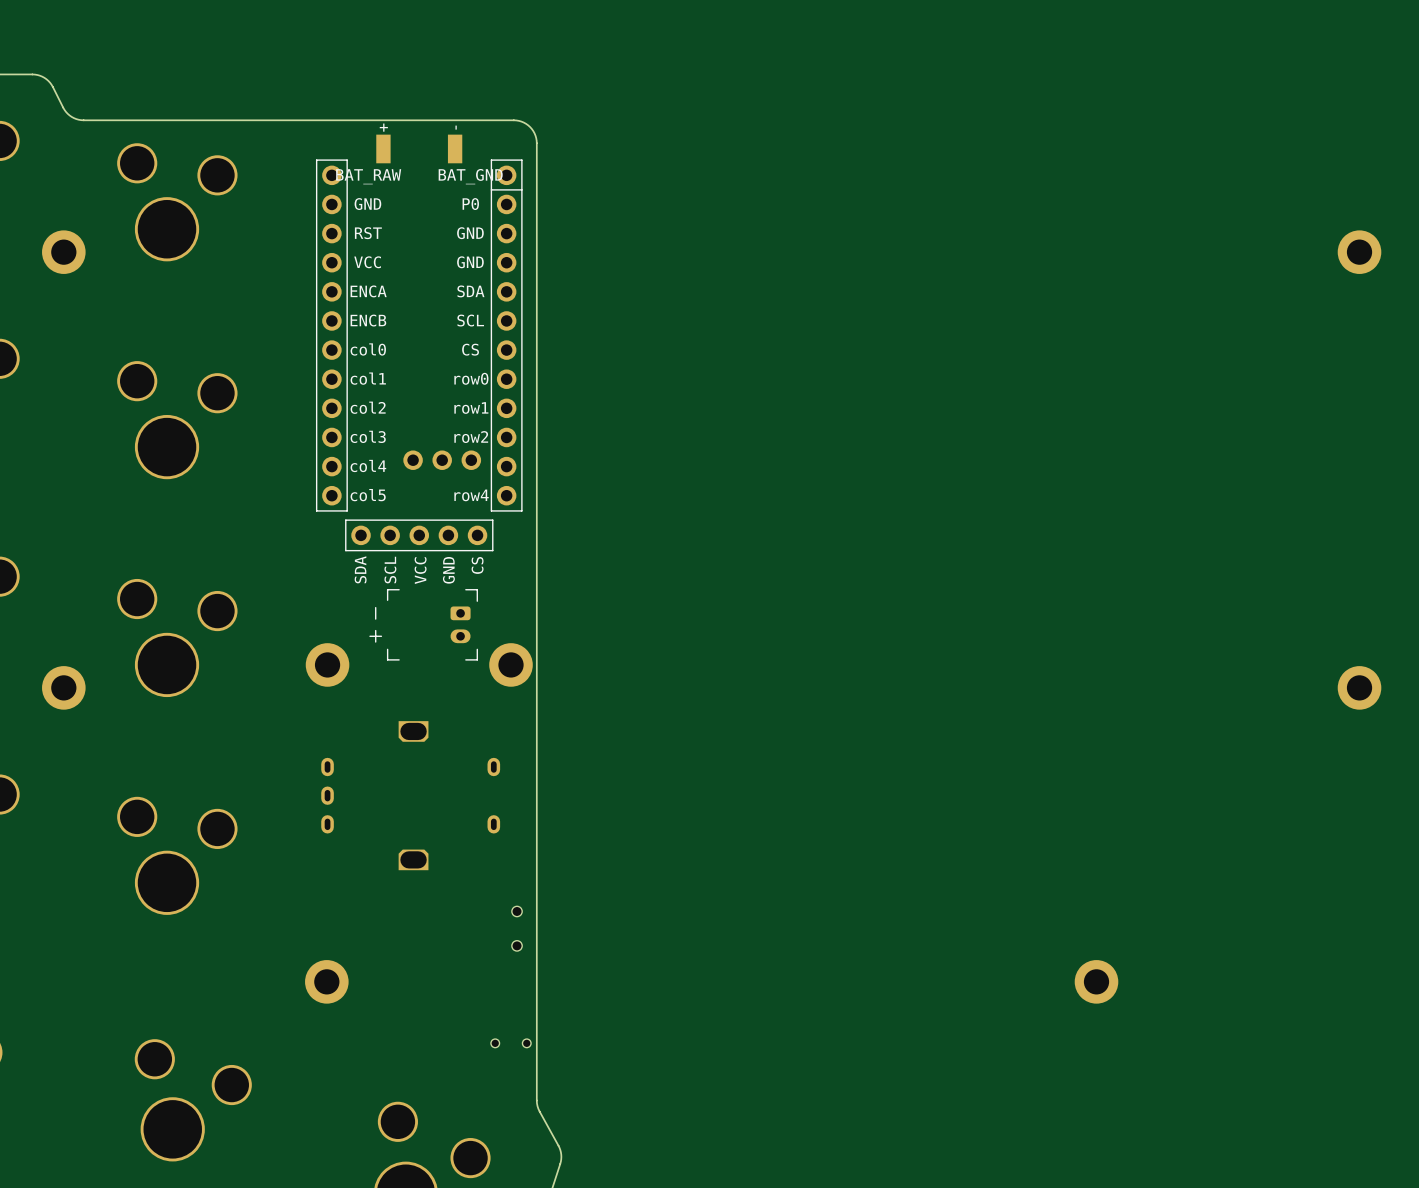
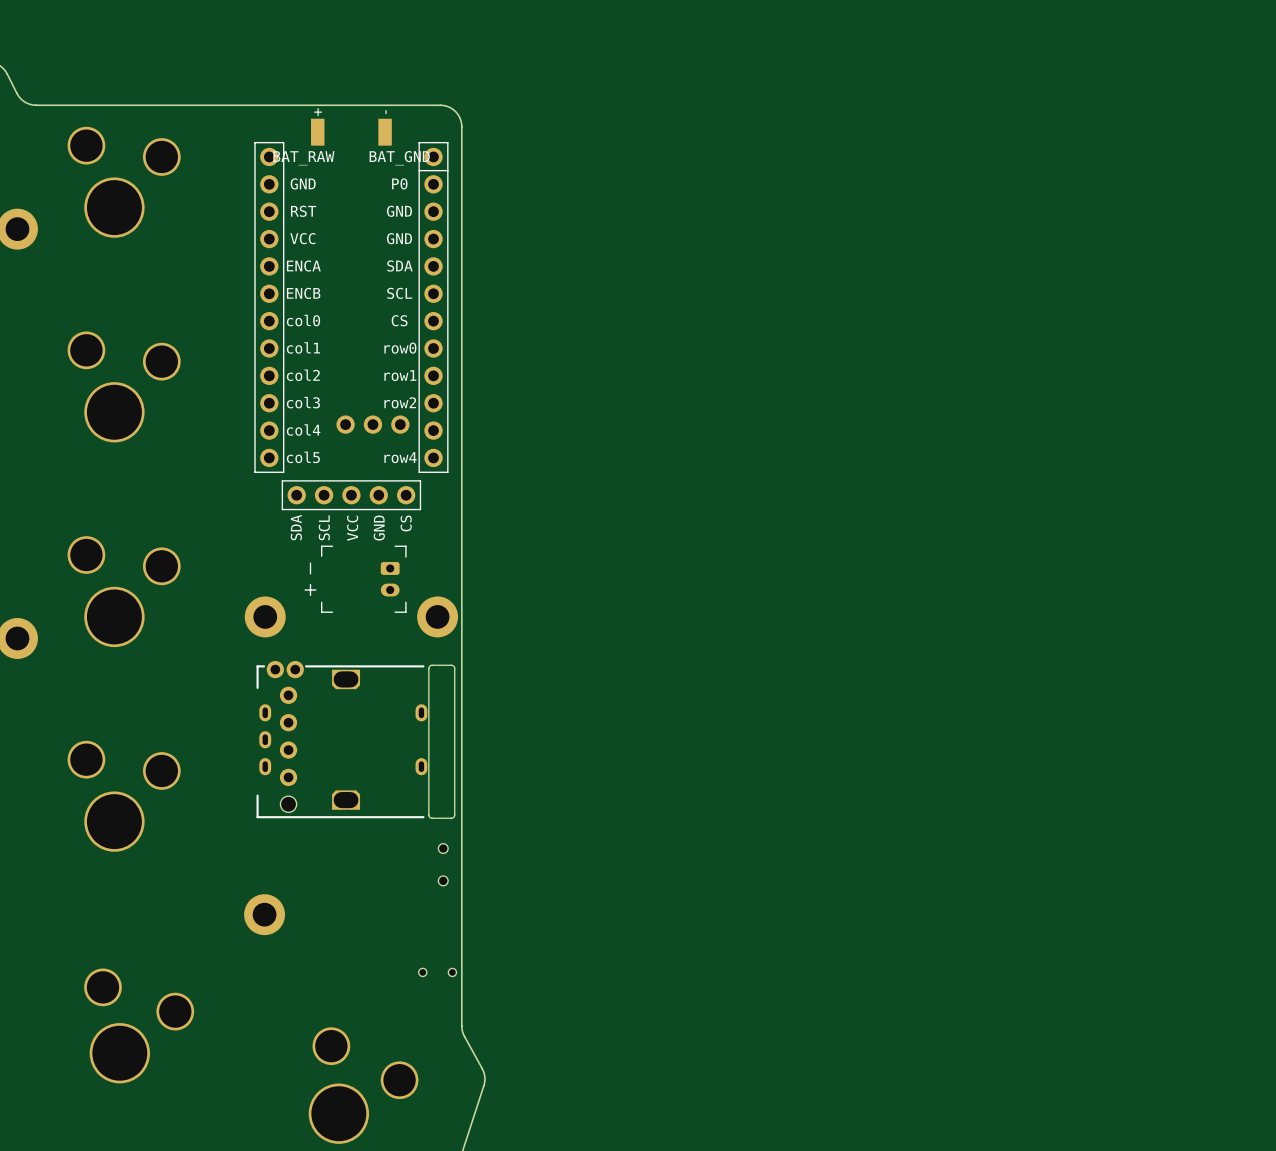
part: (1359, 252) -> none
part: (1359, 687) -> none
part: none -> (355, 739)
part: (1096, 981) -> none

